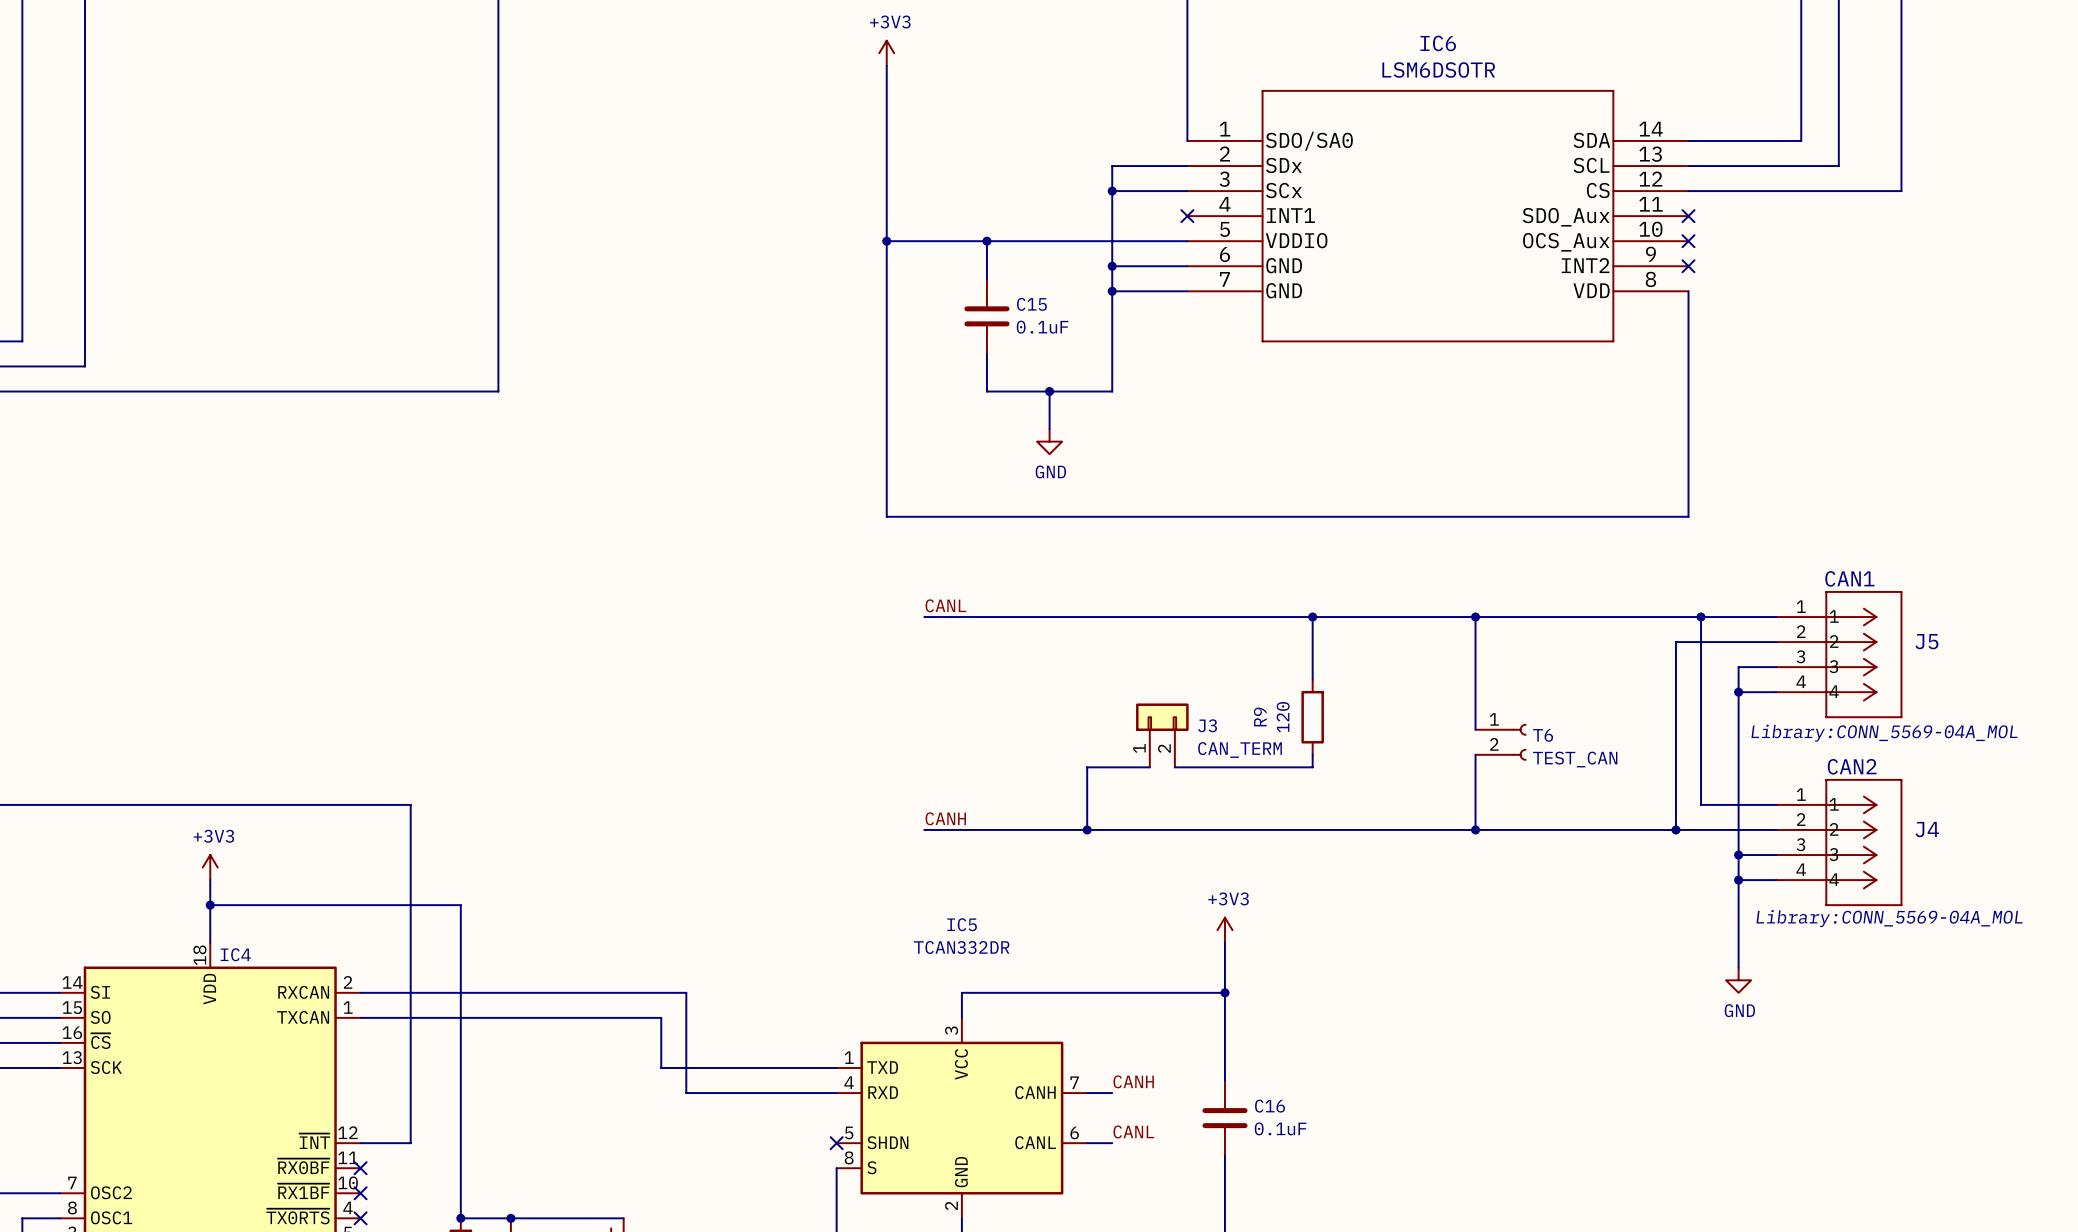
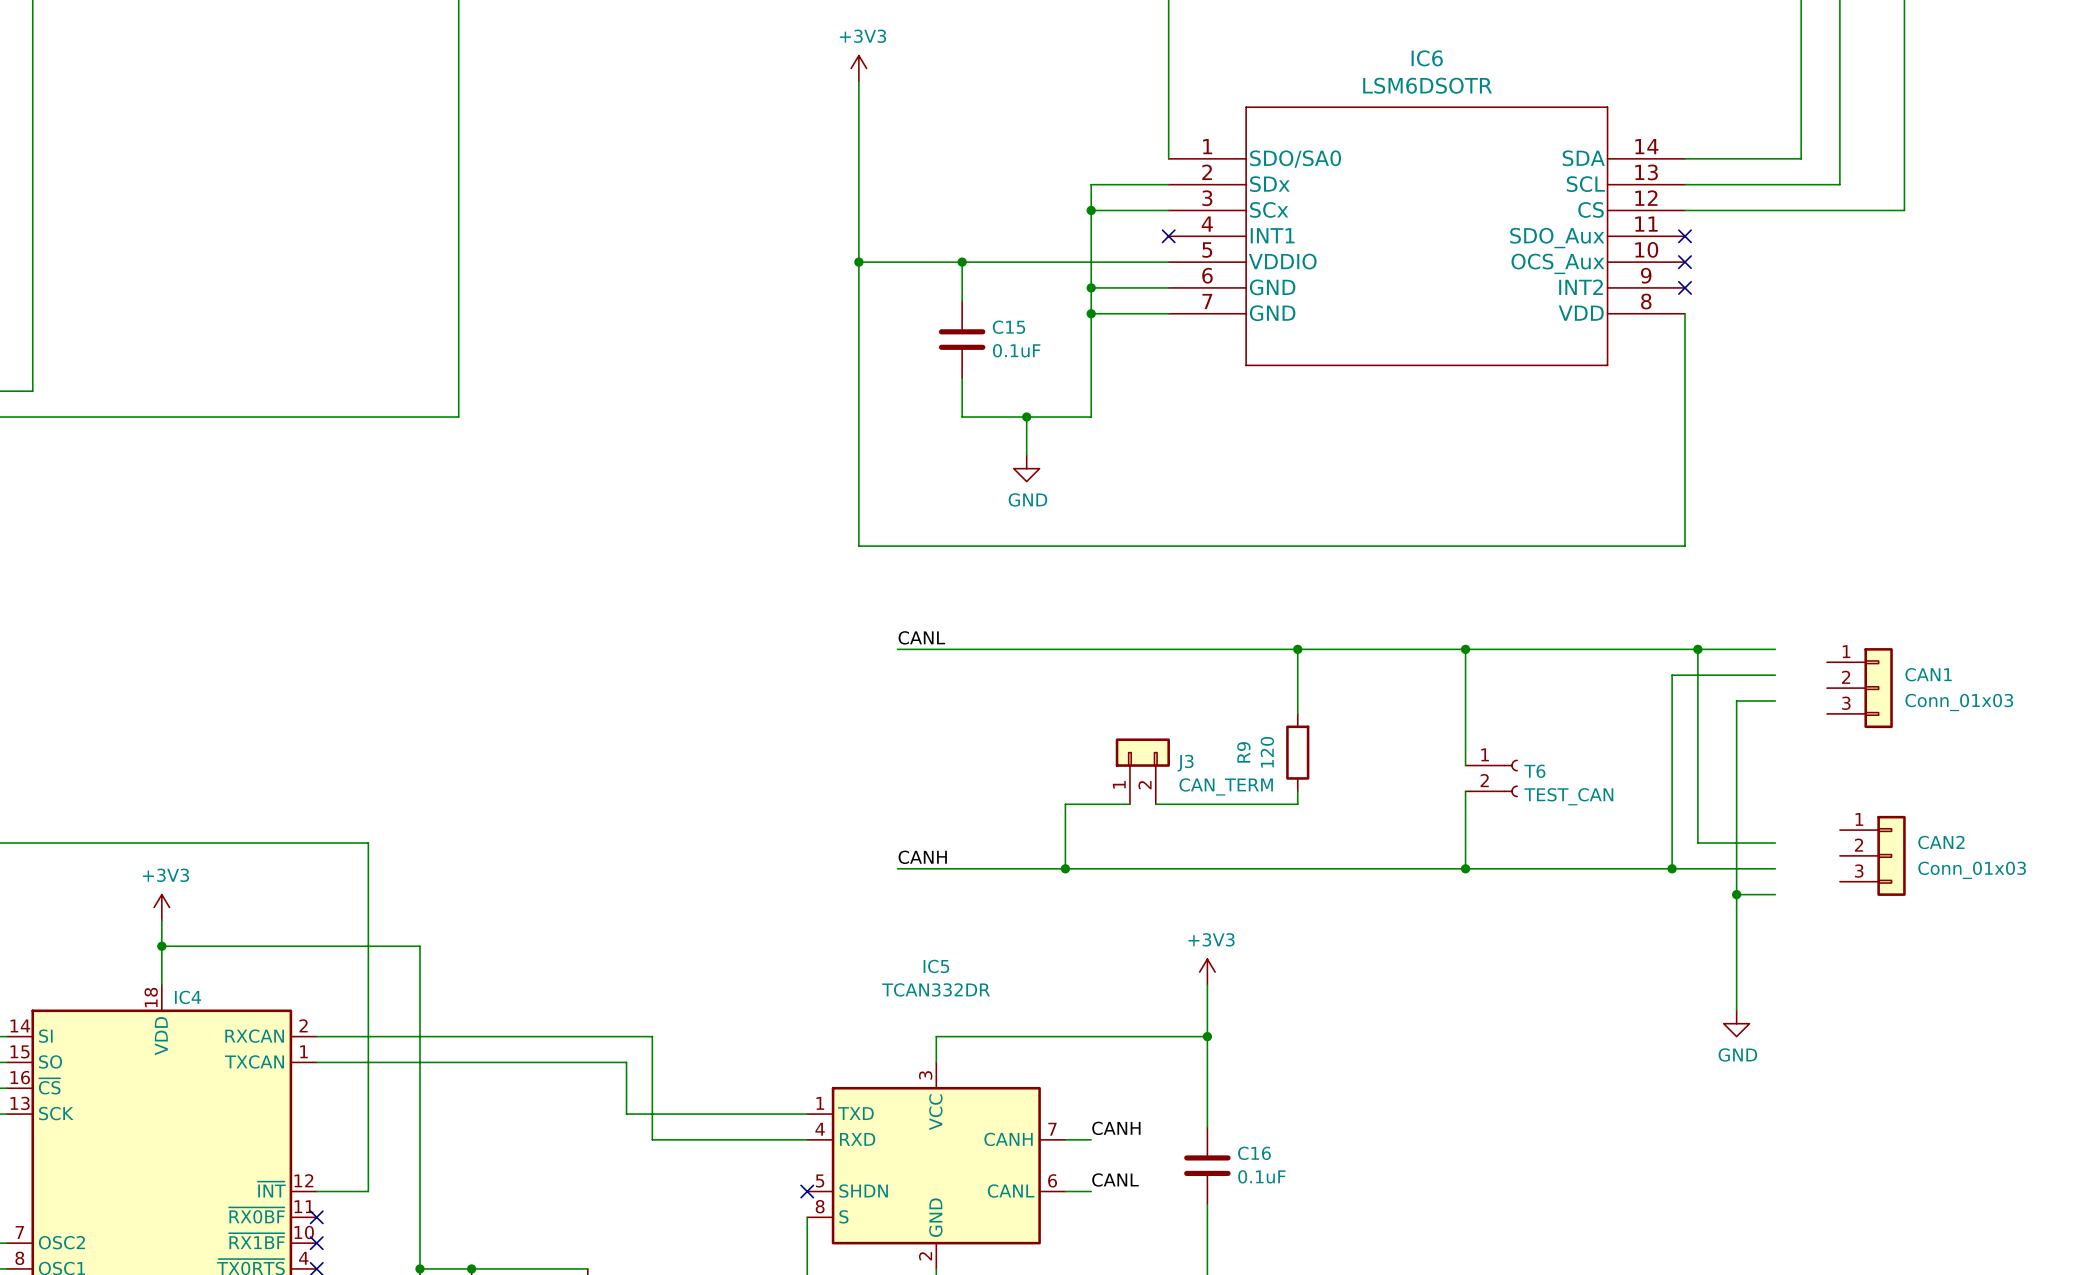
J5: CAN1 (1839, 654) -> none
CAN1: none -> Conn_01x03 (1859, 688)
wire: (1738, 692) (1776, 692) -> none
junction: (1738, 692) -> none
CAN2: none -> Conn_01x03 (1872, 855)
J4: CAN2 (1839, 842) -> none
wire: (1738, 880) (1776, 880) -> none
junction: (1738, 880) -> none

